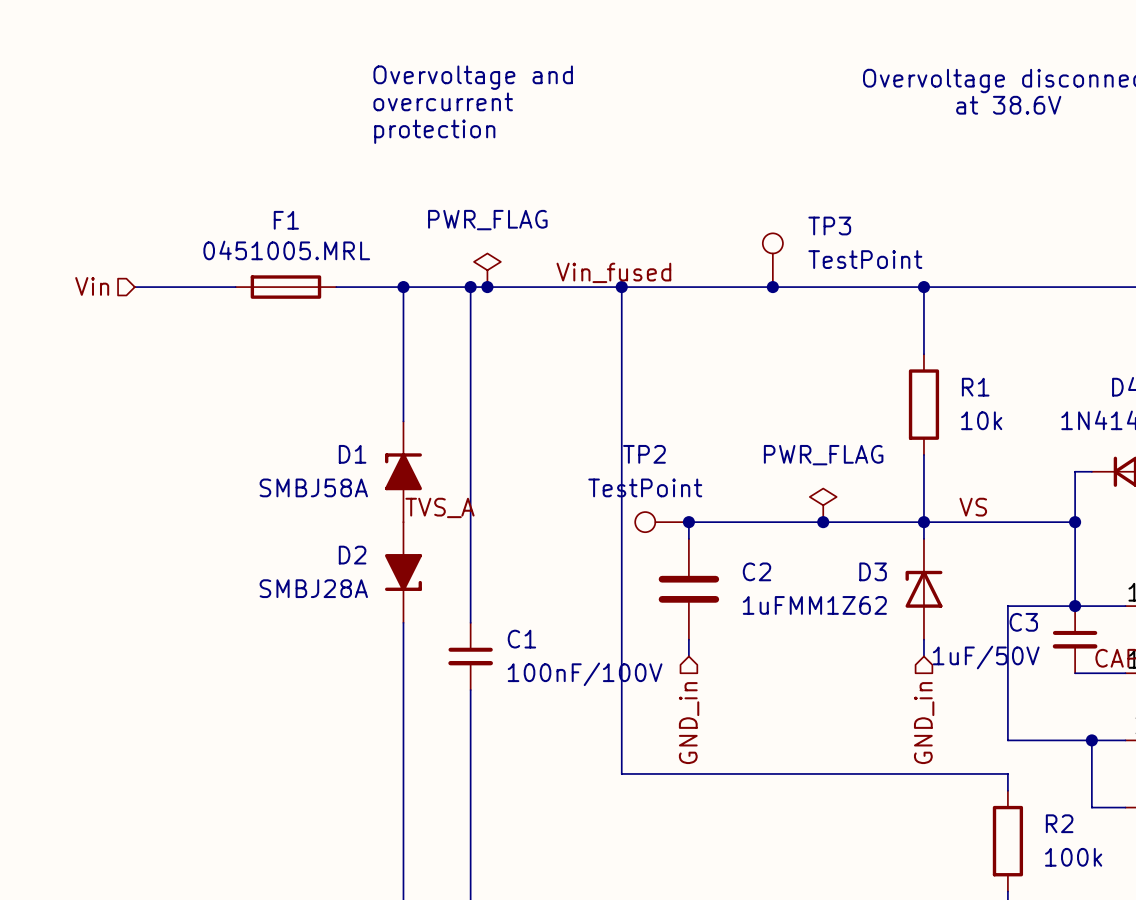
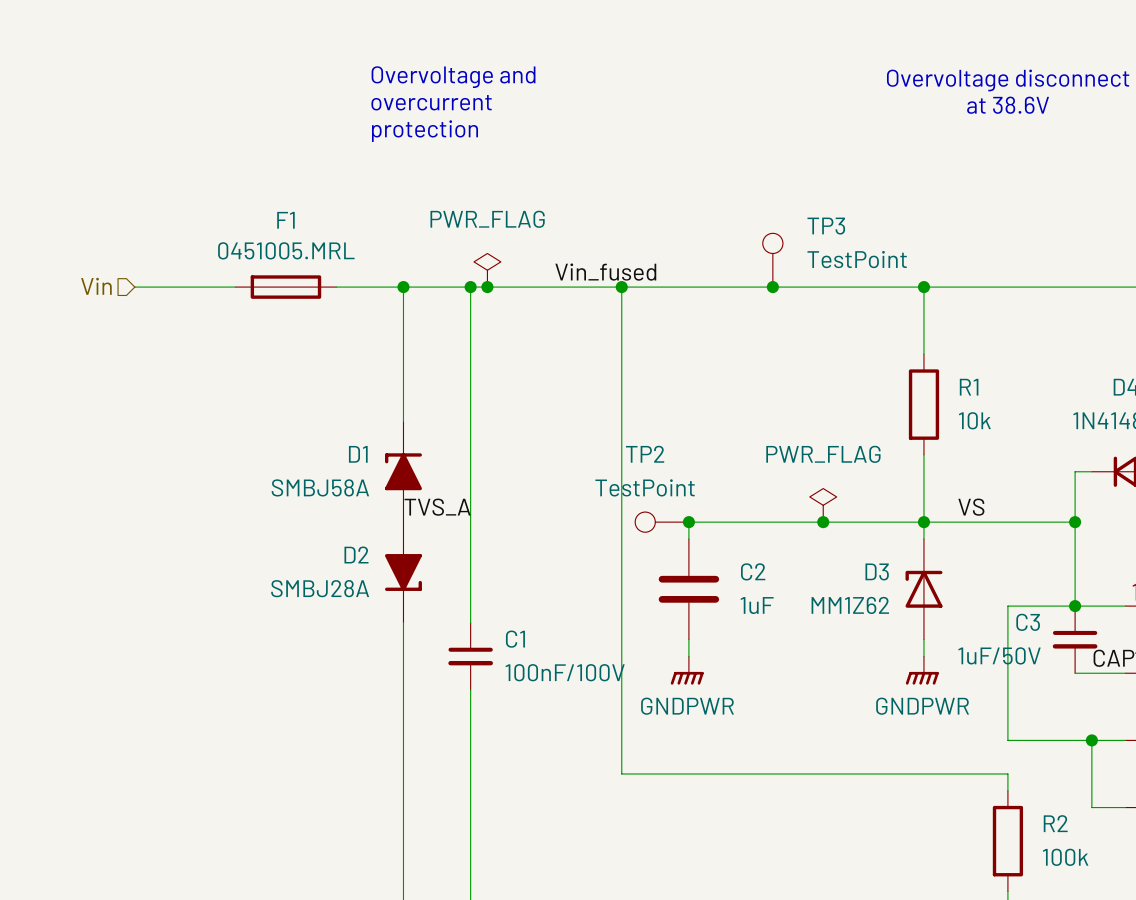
power symbol: none -> GNDPWR (687, 670)
power symbol: none -> GNDPWR (922, 670)
hierarchical label: GND_in (689, 723) -> none
hierarchical label: GND_in (924, 723) -> none

